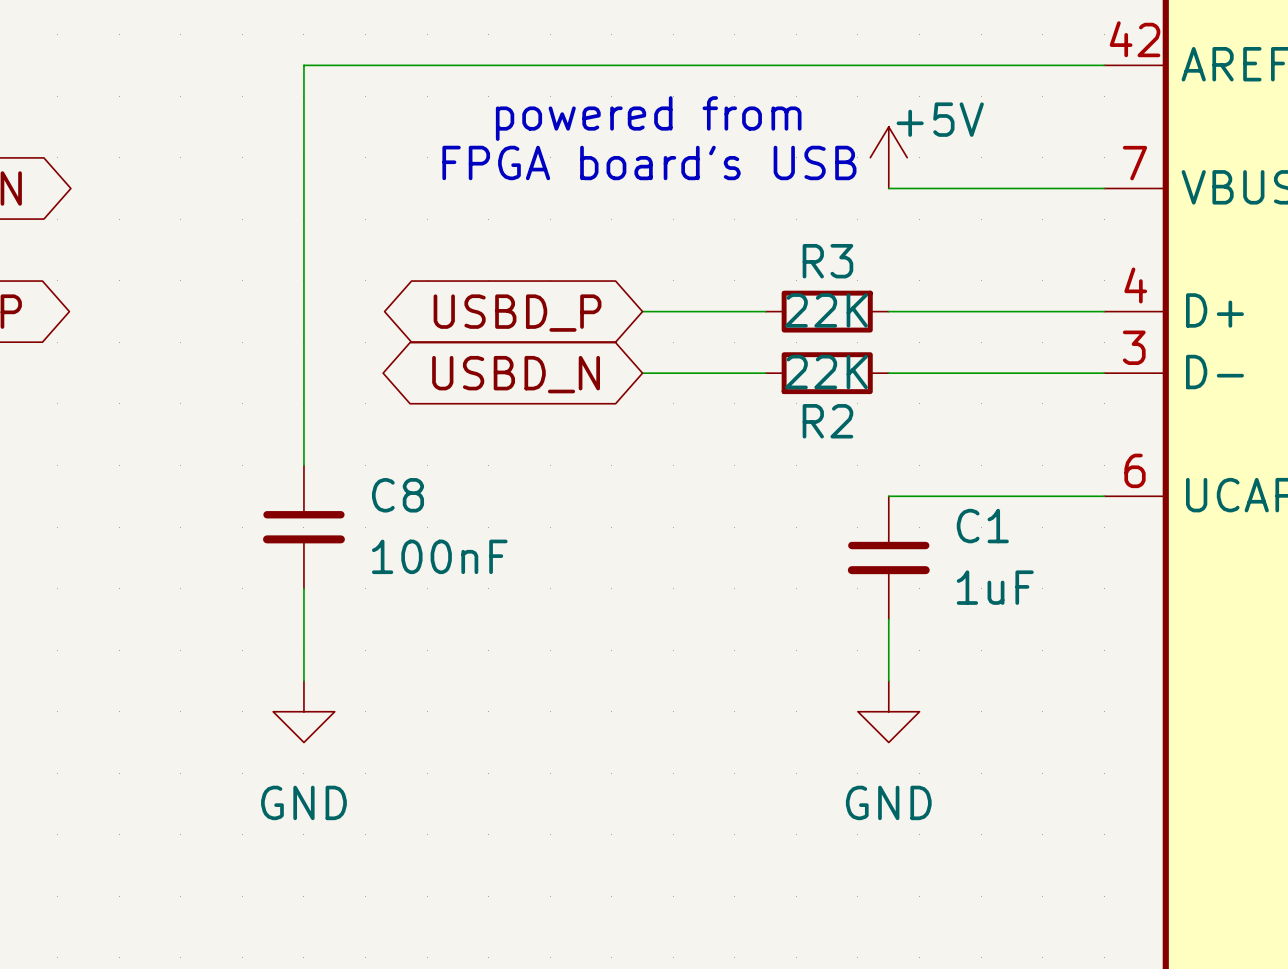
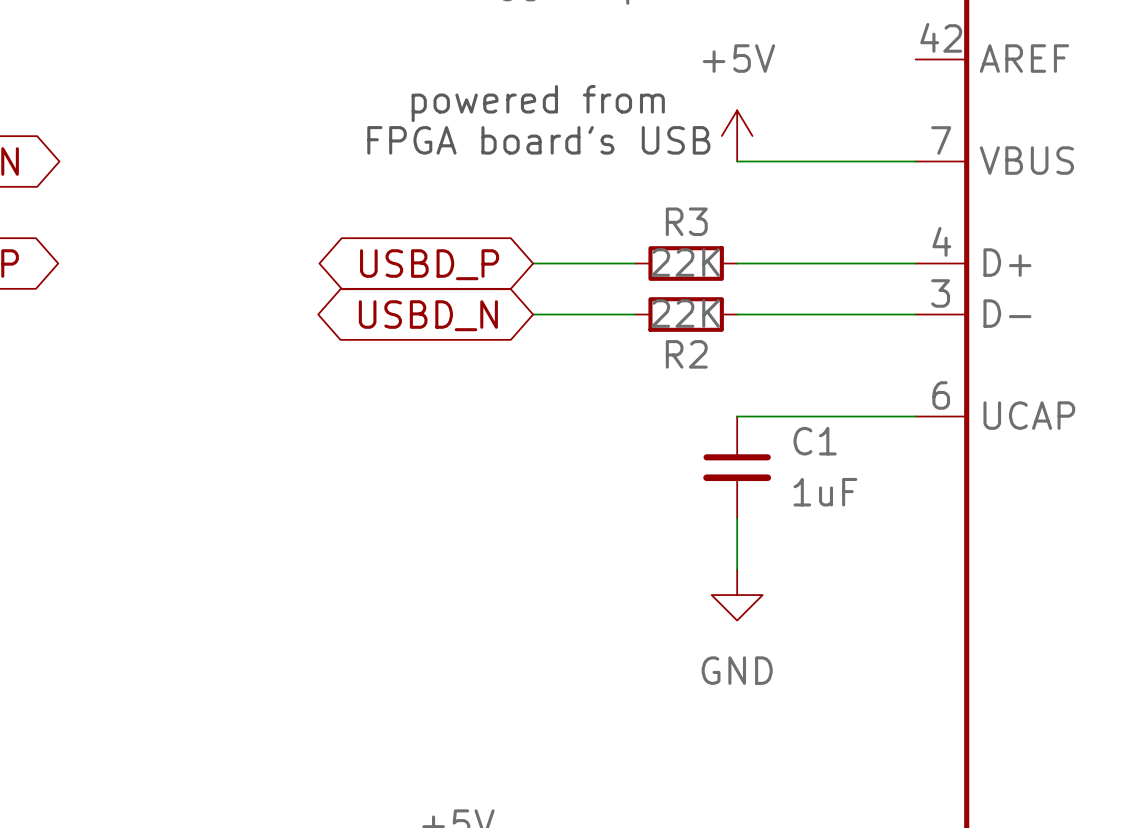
wire: (1104, 65) (303, 65) (303, 465) -> none
power symbol text position: +5V (940, 119) -> +5V (738, 58)
C8: 100nF (303, 527) -> none
wire: (303, 588) (303, 680) -> none
power symbol: GND (303, 711) -> none

